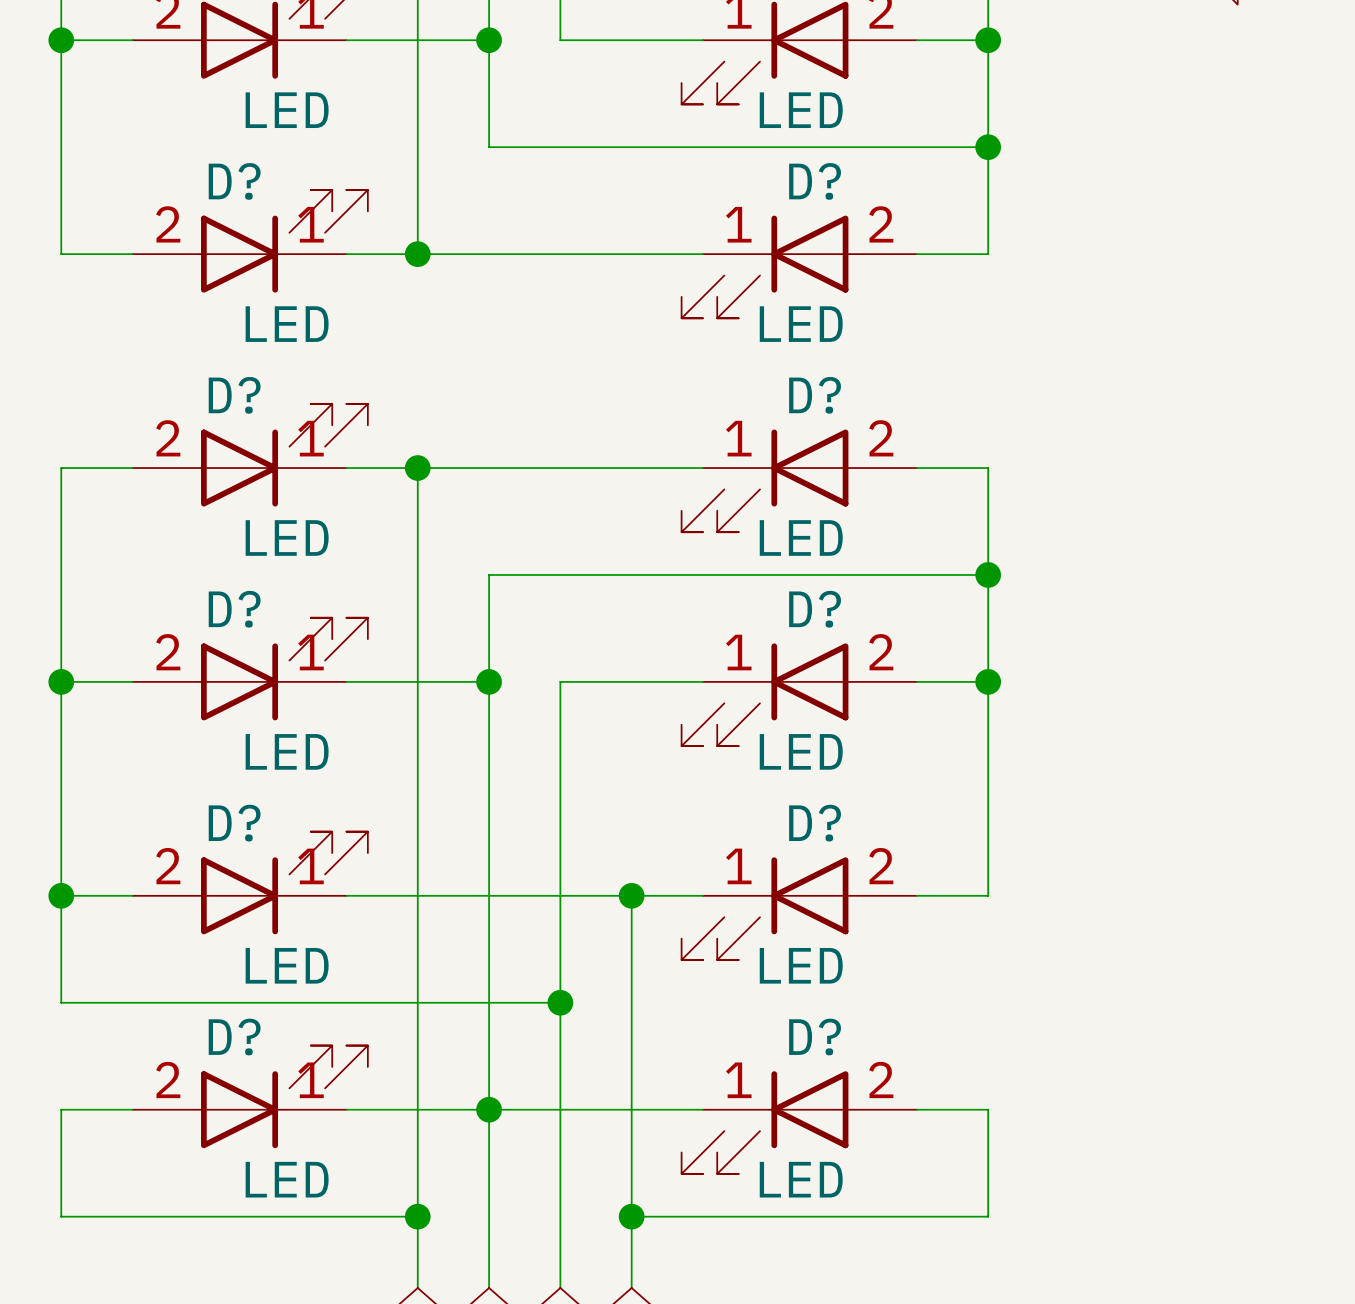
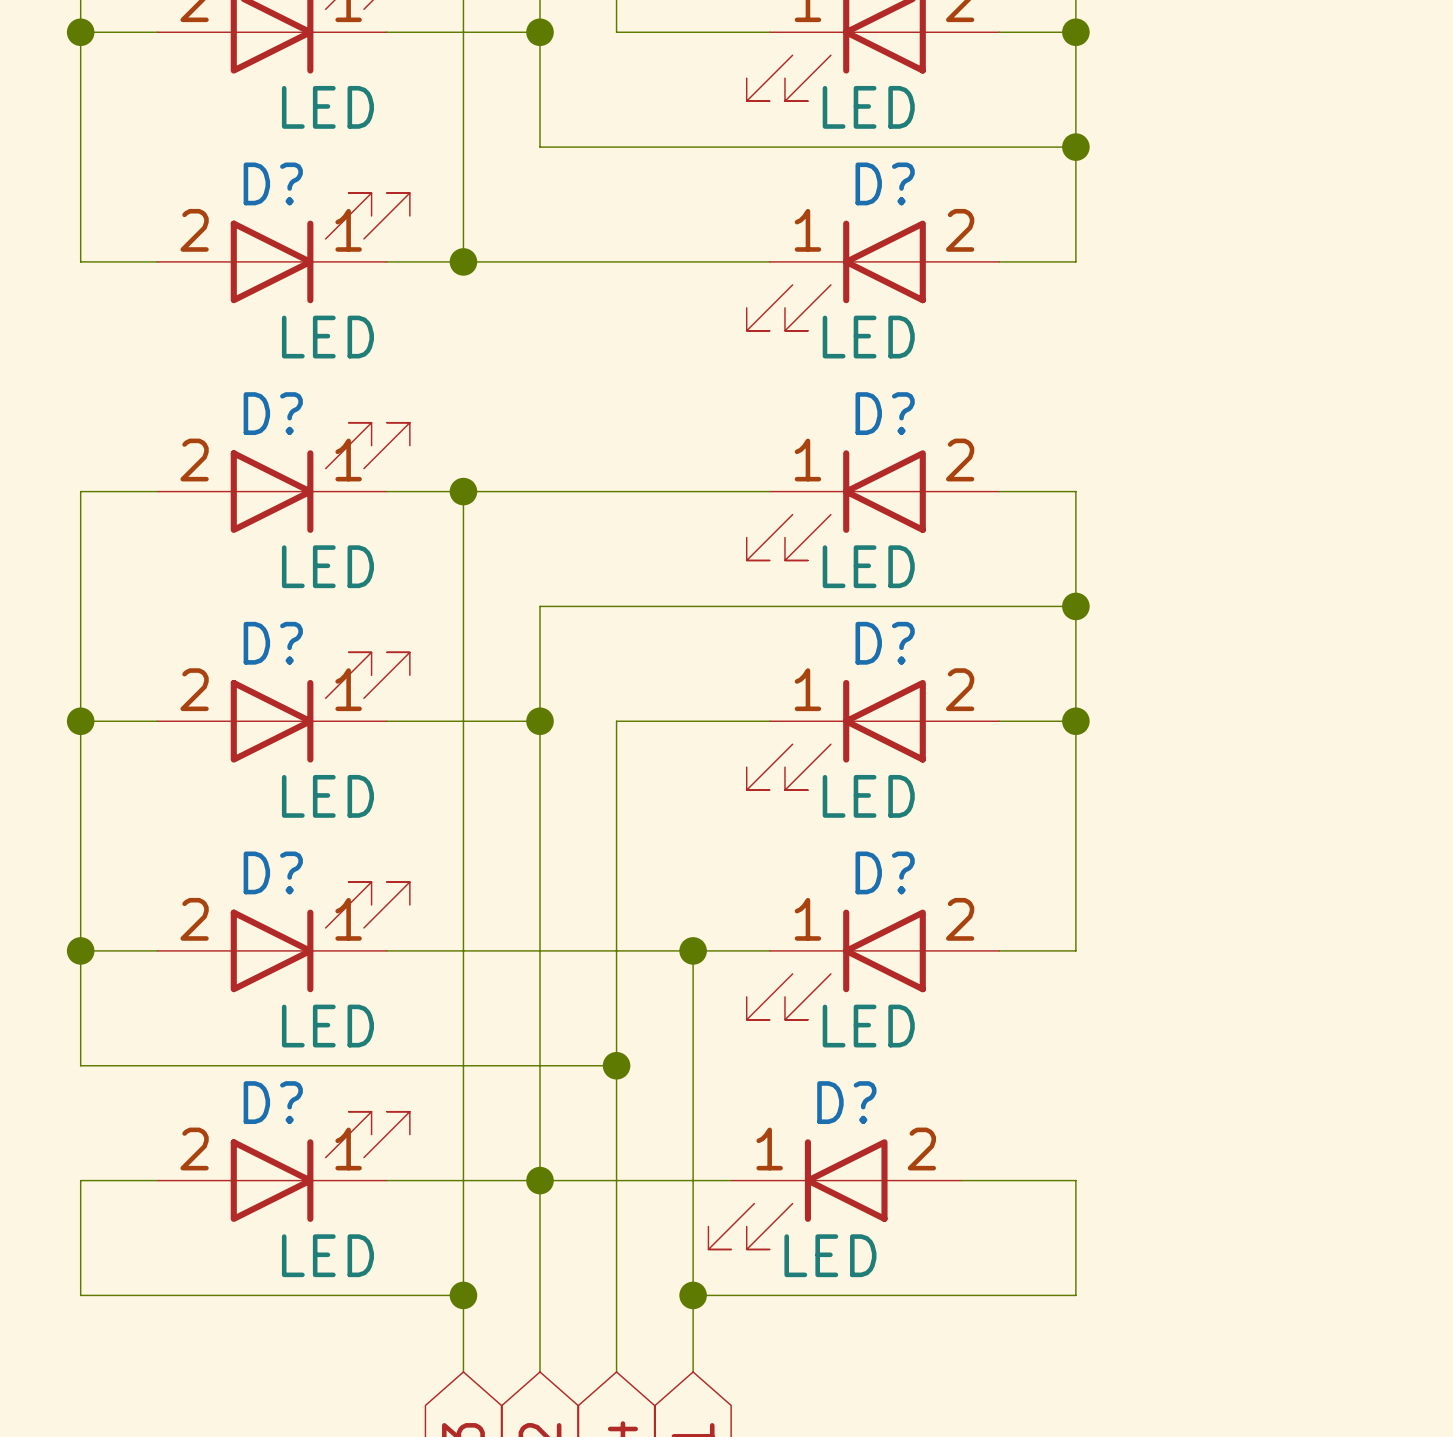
D? position: (799, 1122) -> (834, 1194)

